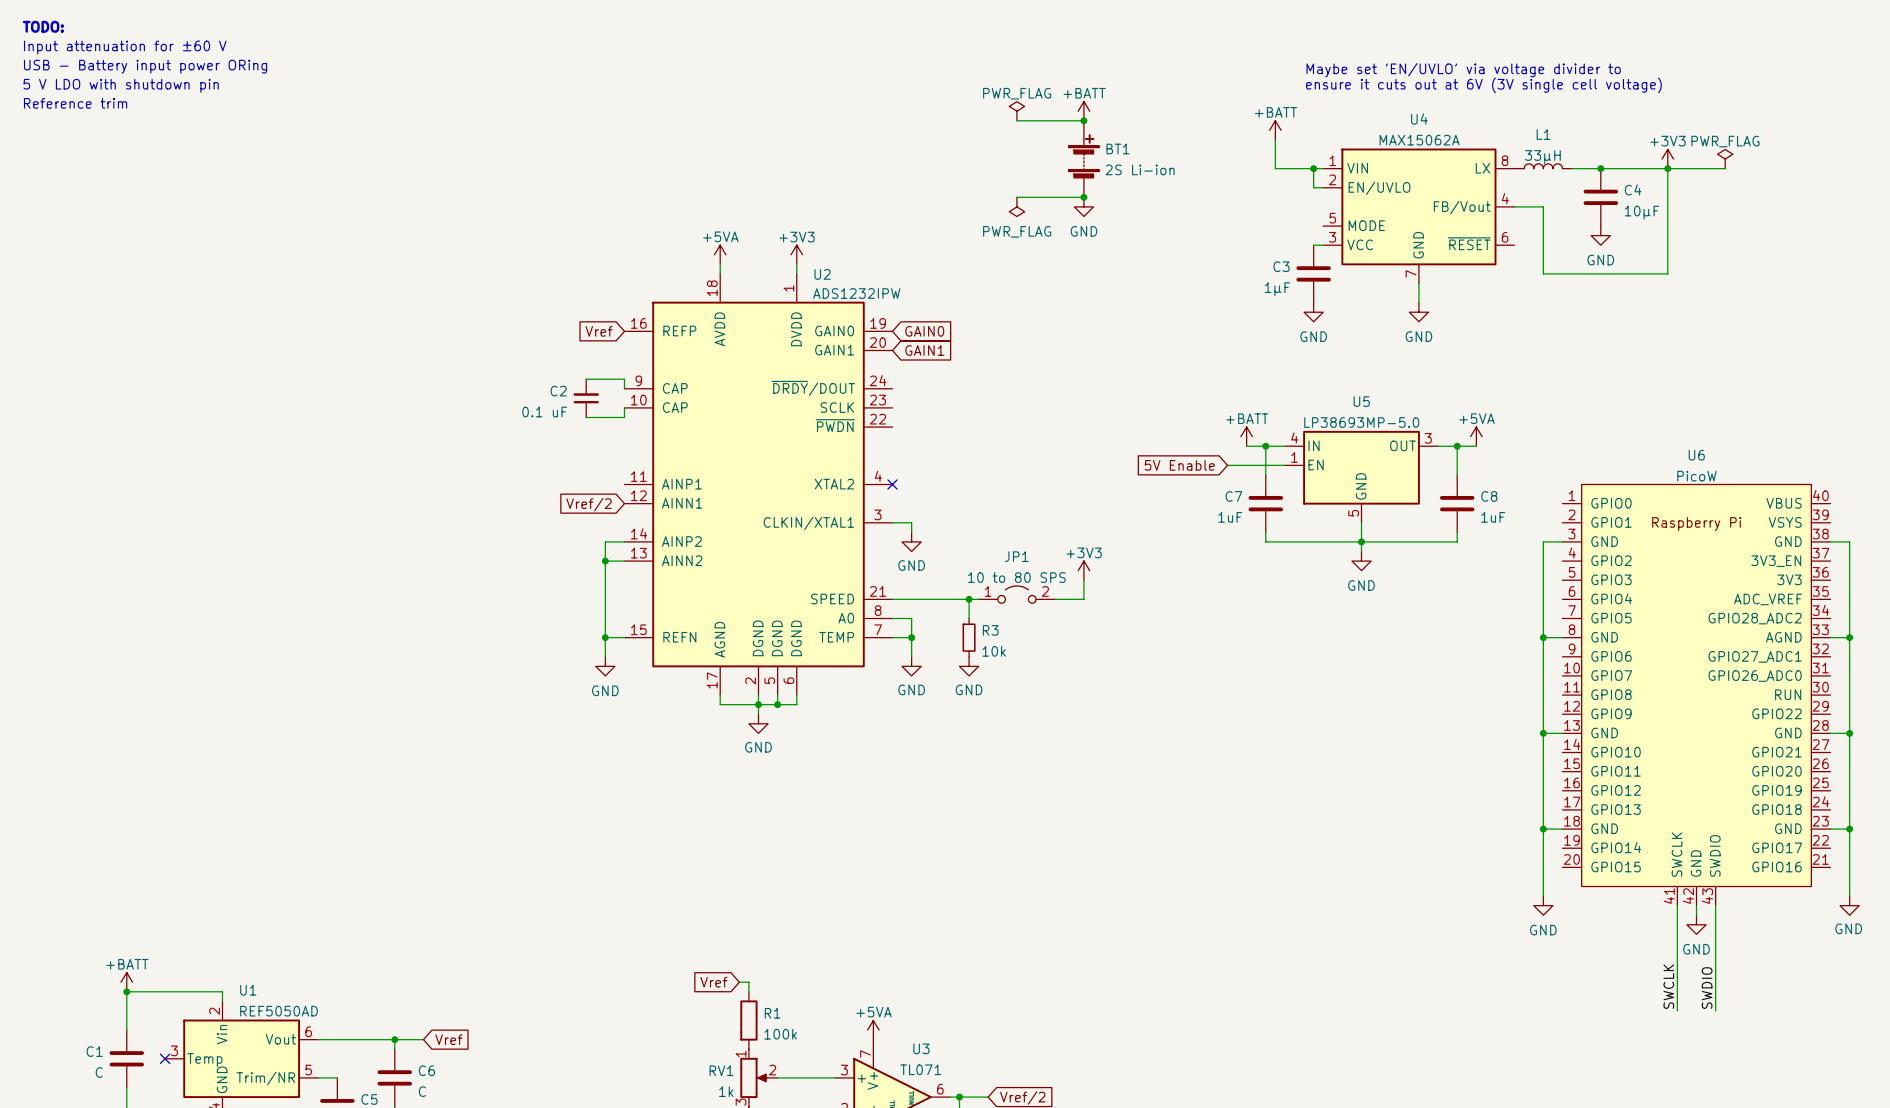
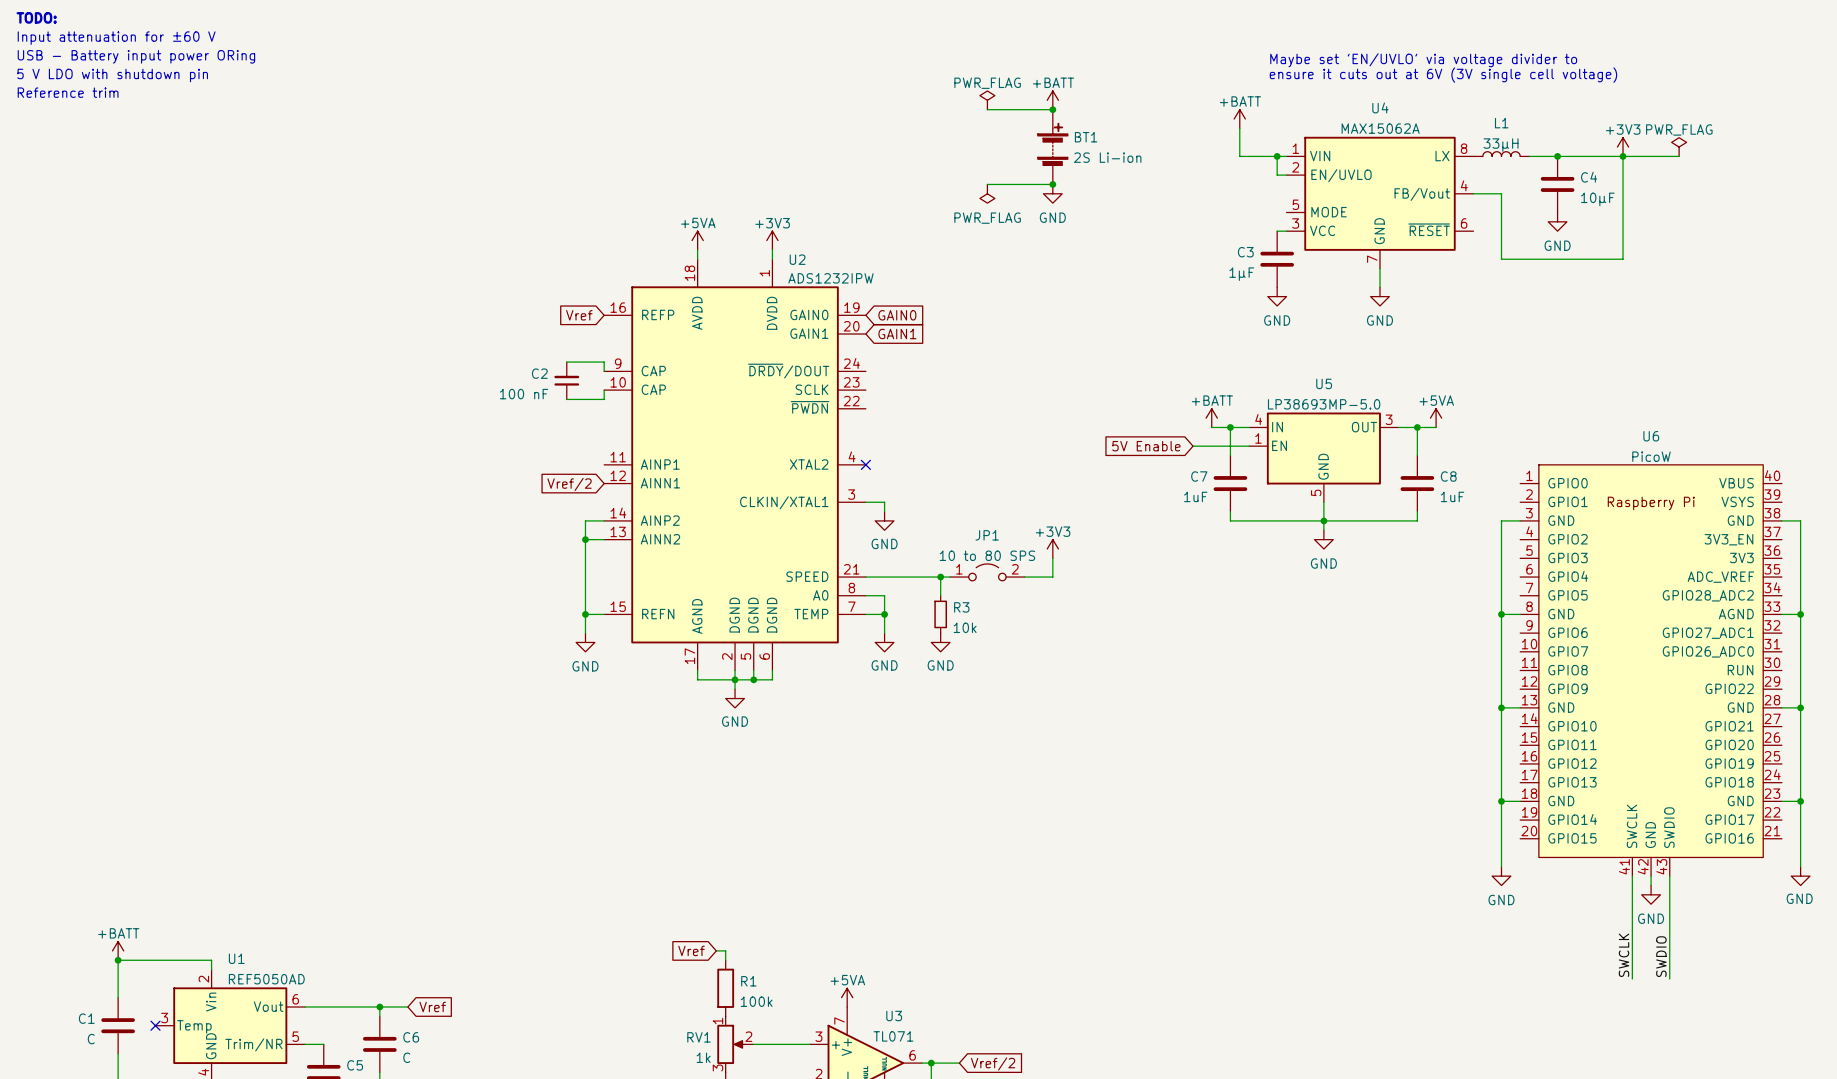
C2 value: 0.1 uF (544, 412) -> 100 nF (524, 394)

